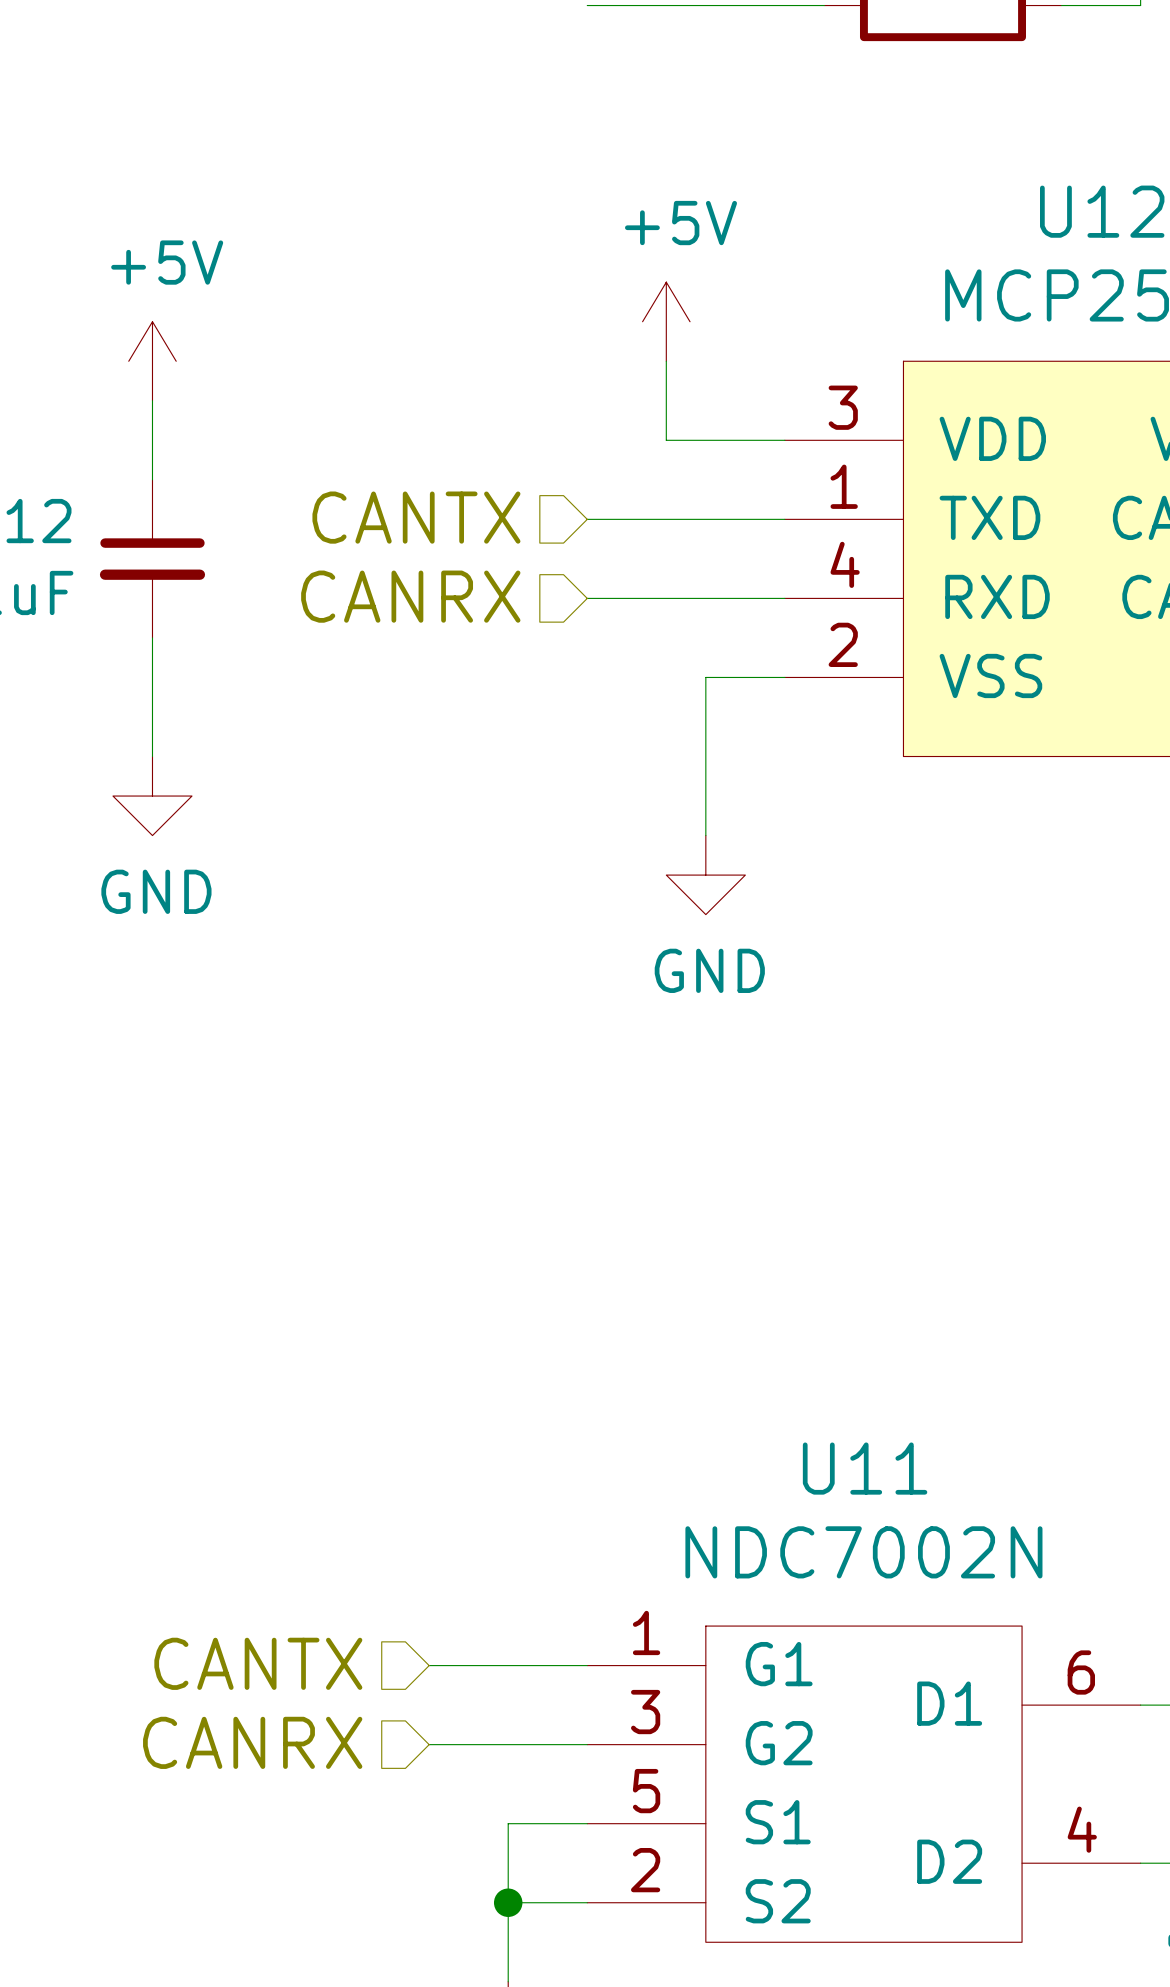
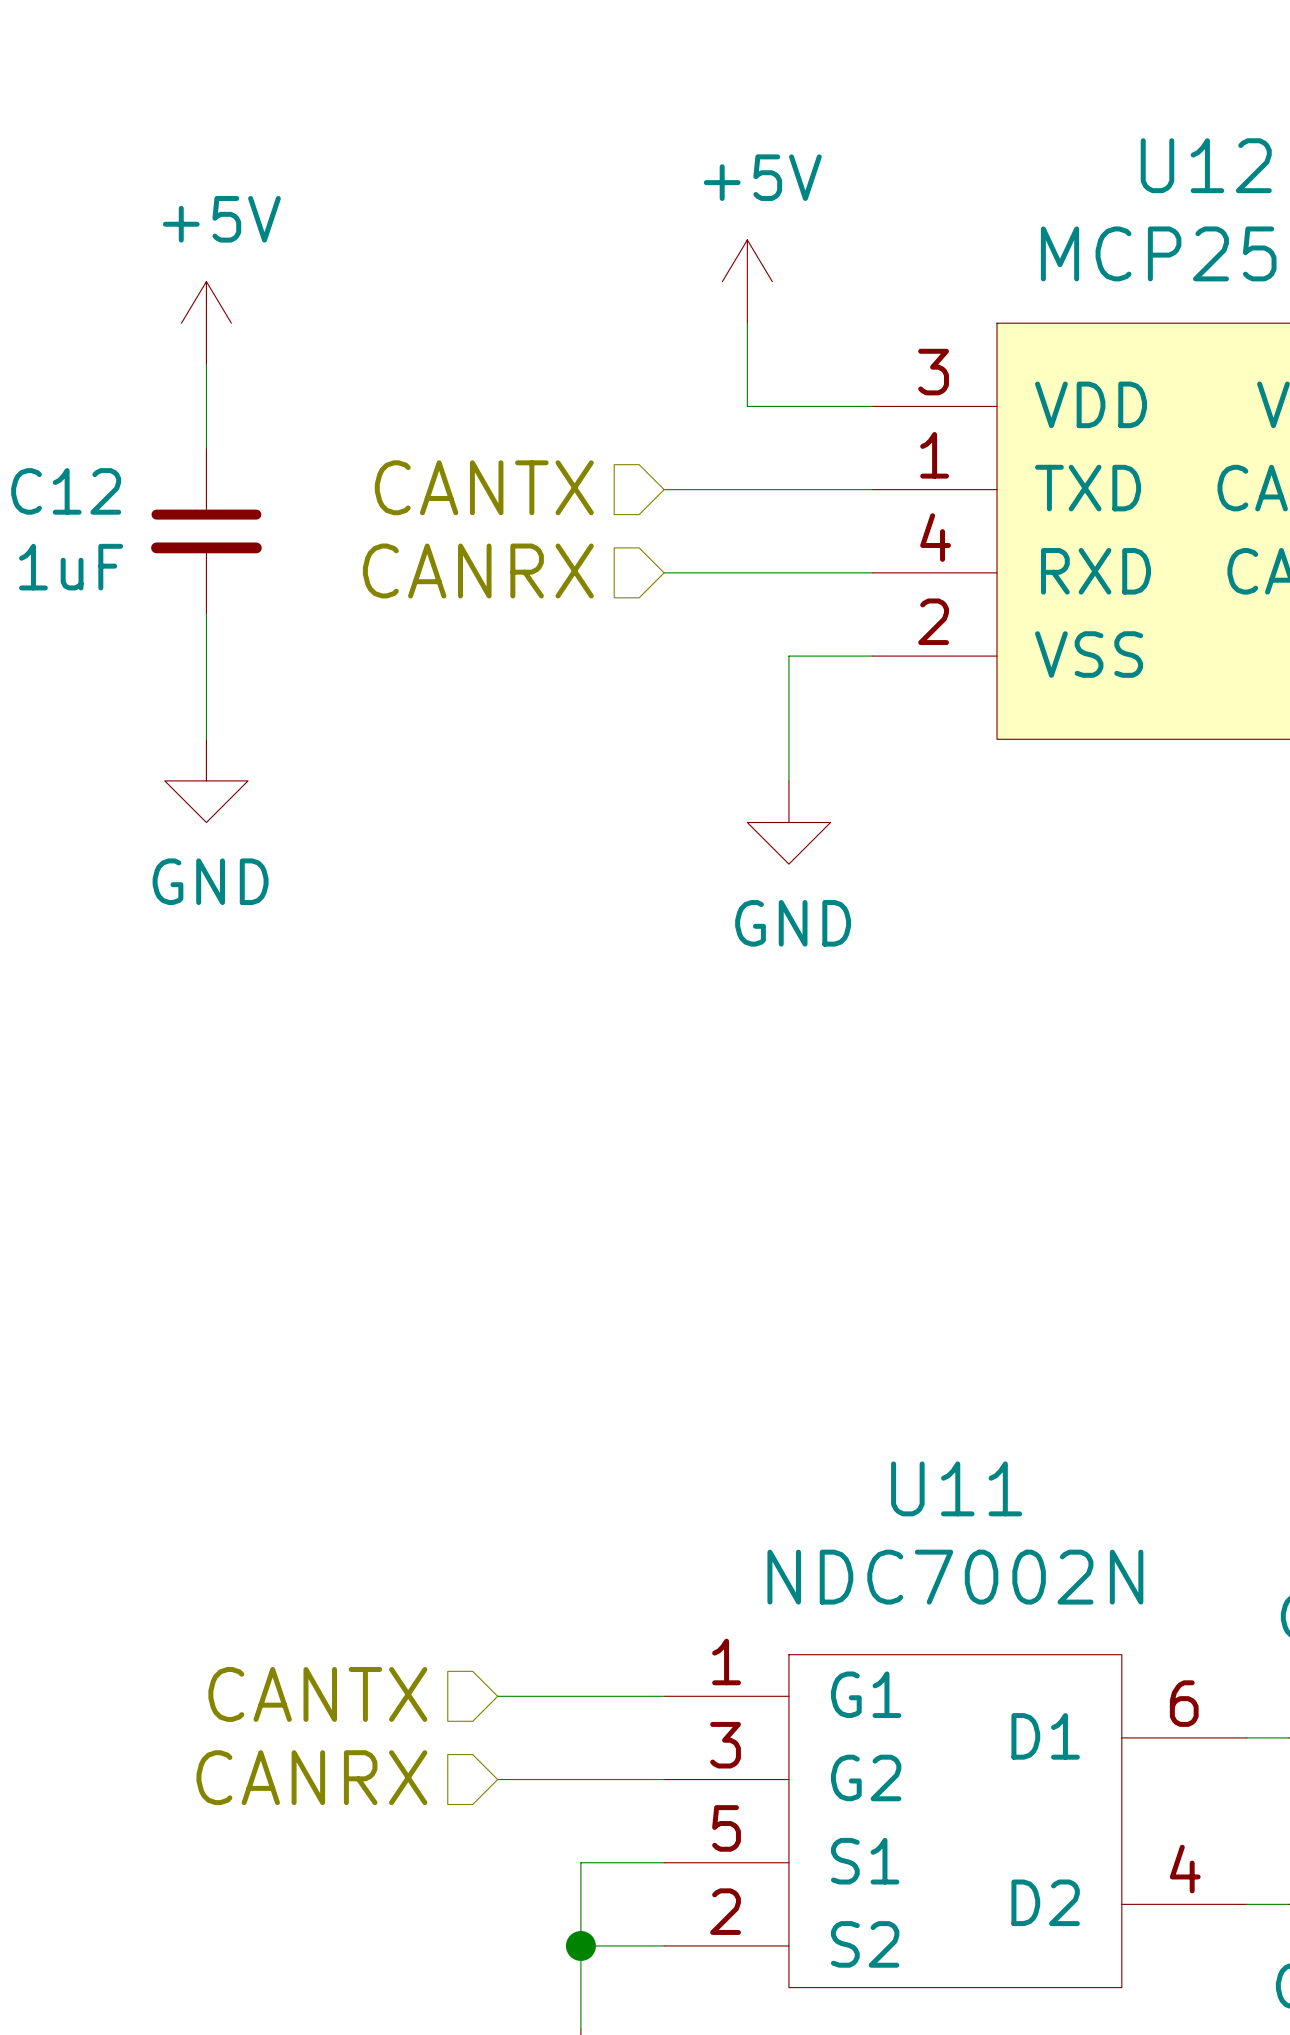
power symbol position: GND (705, 875) -> GND (788, 822)

